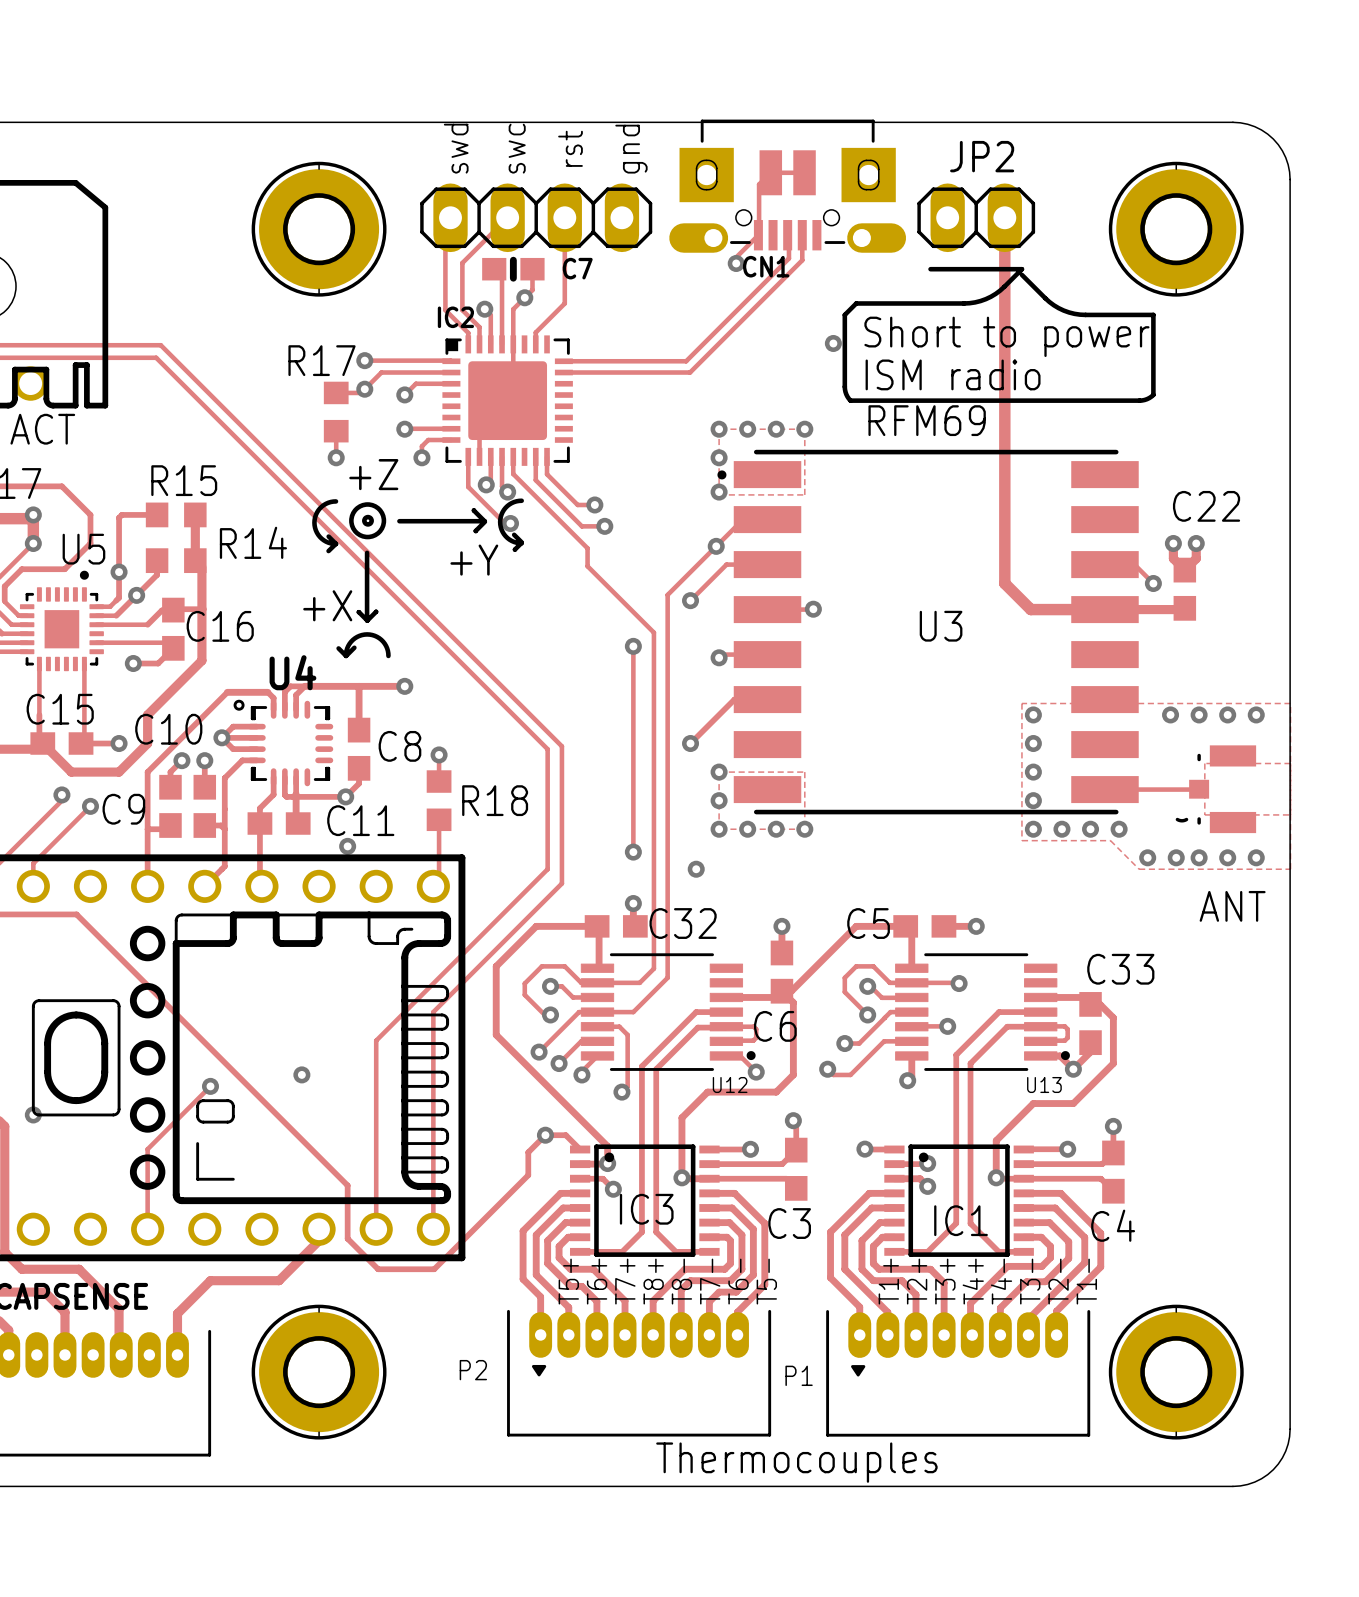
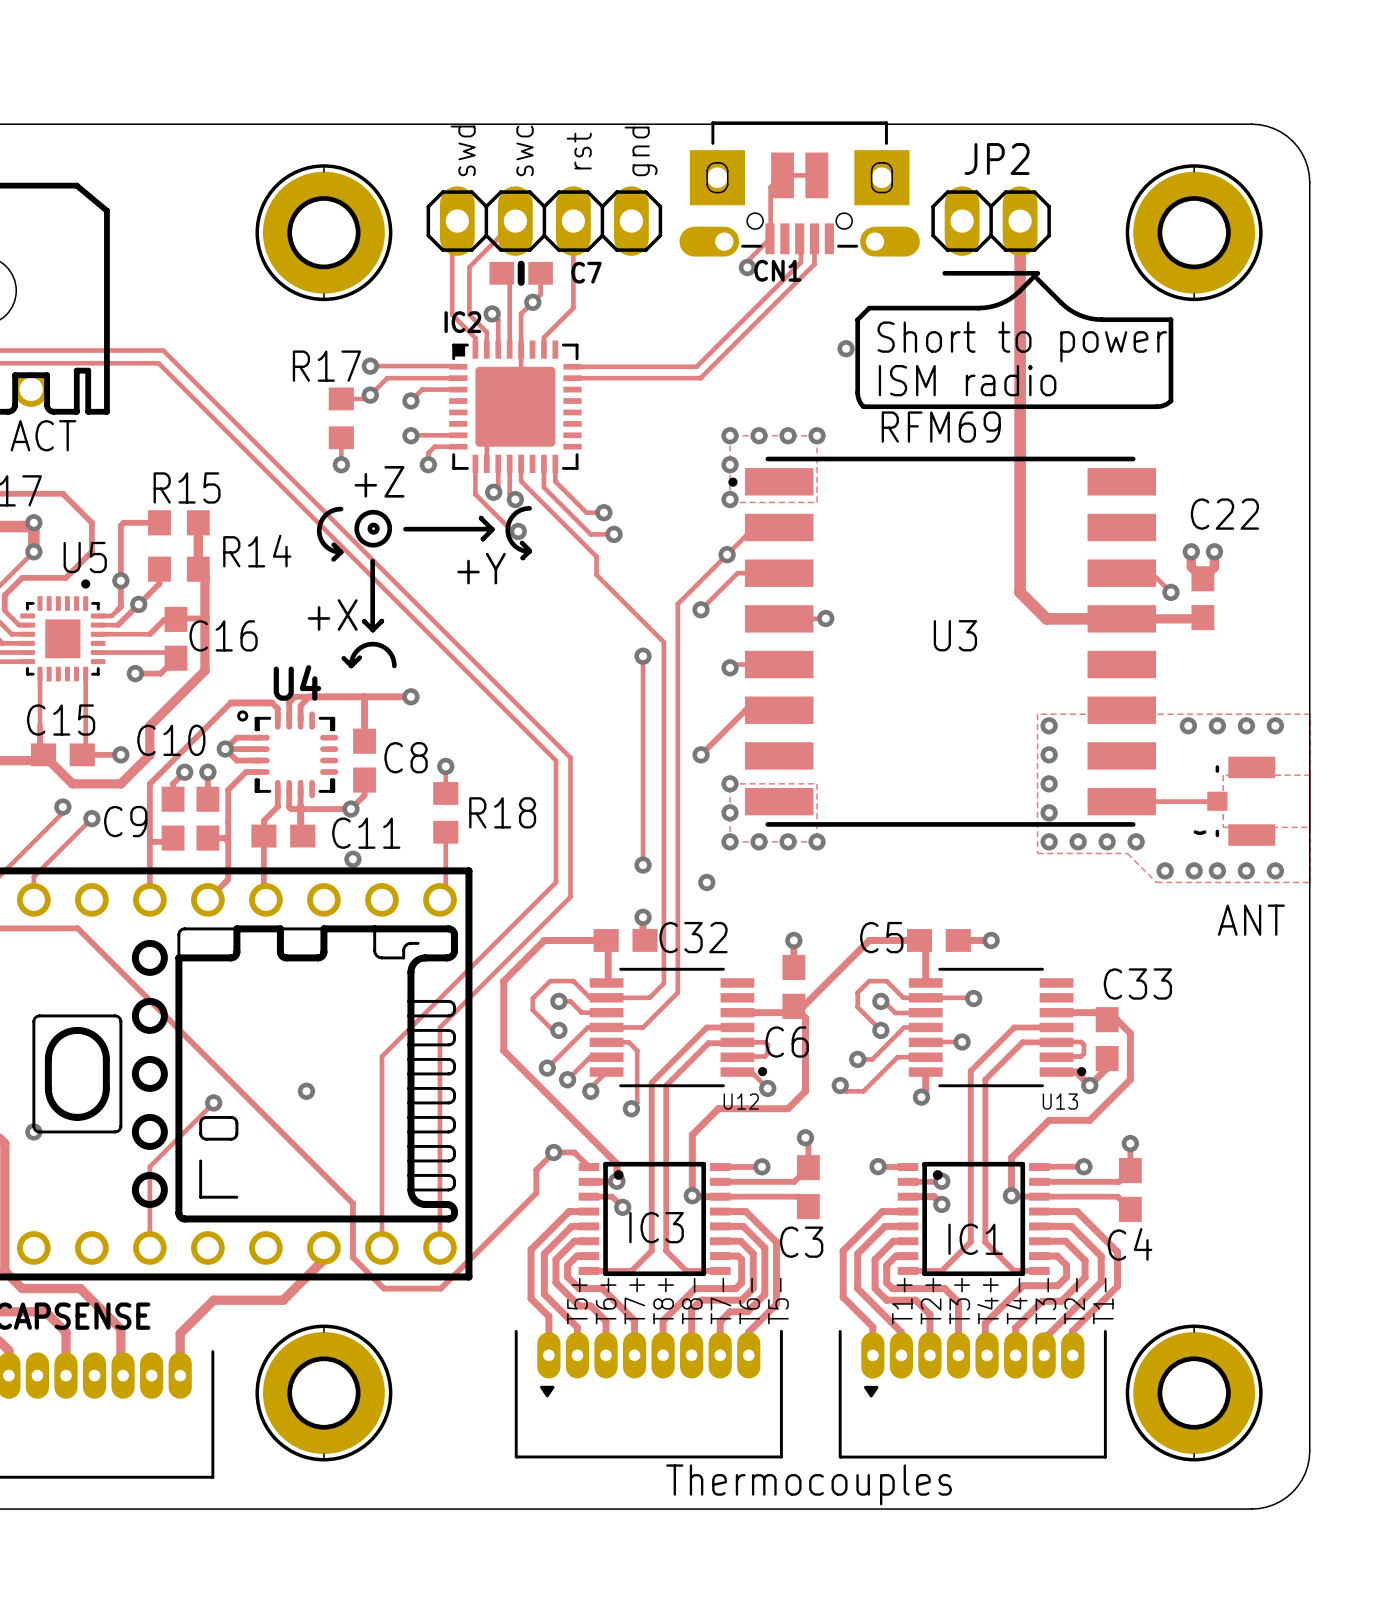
text: P2 (473, 1370) -> none
text: P1 (799, 1375) -> none

